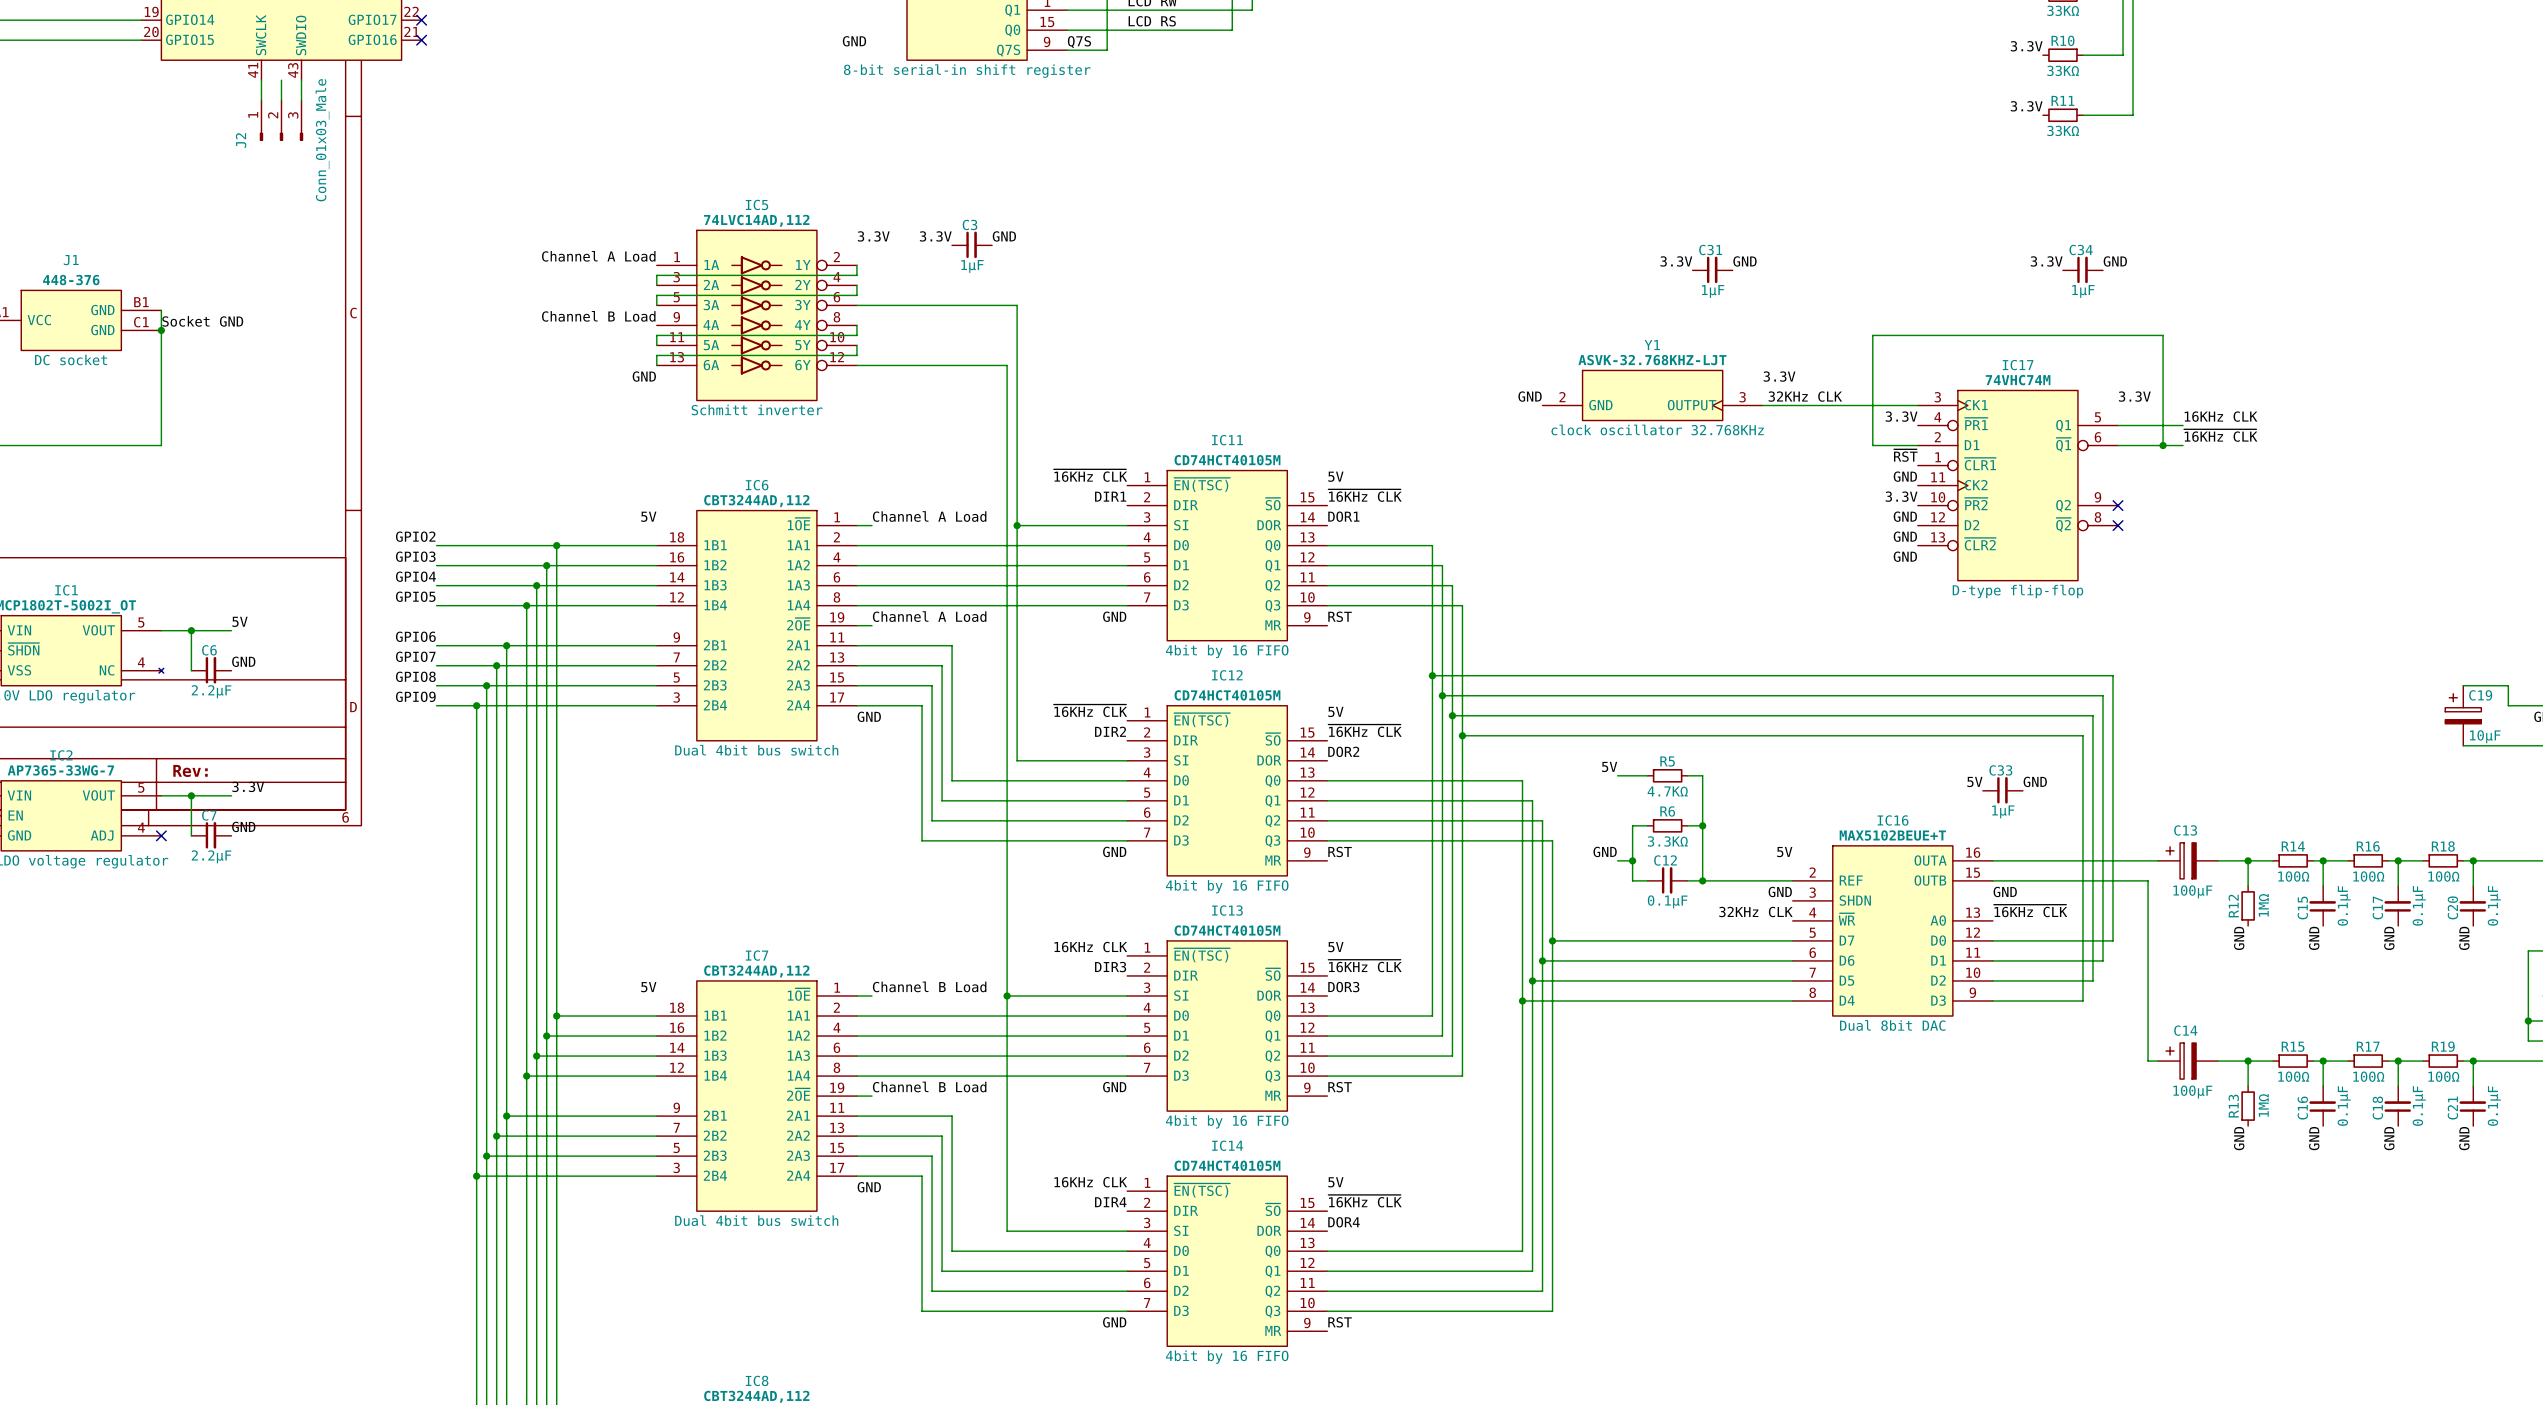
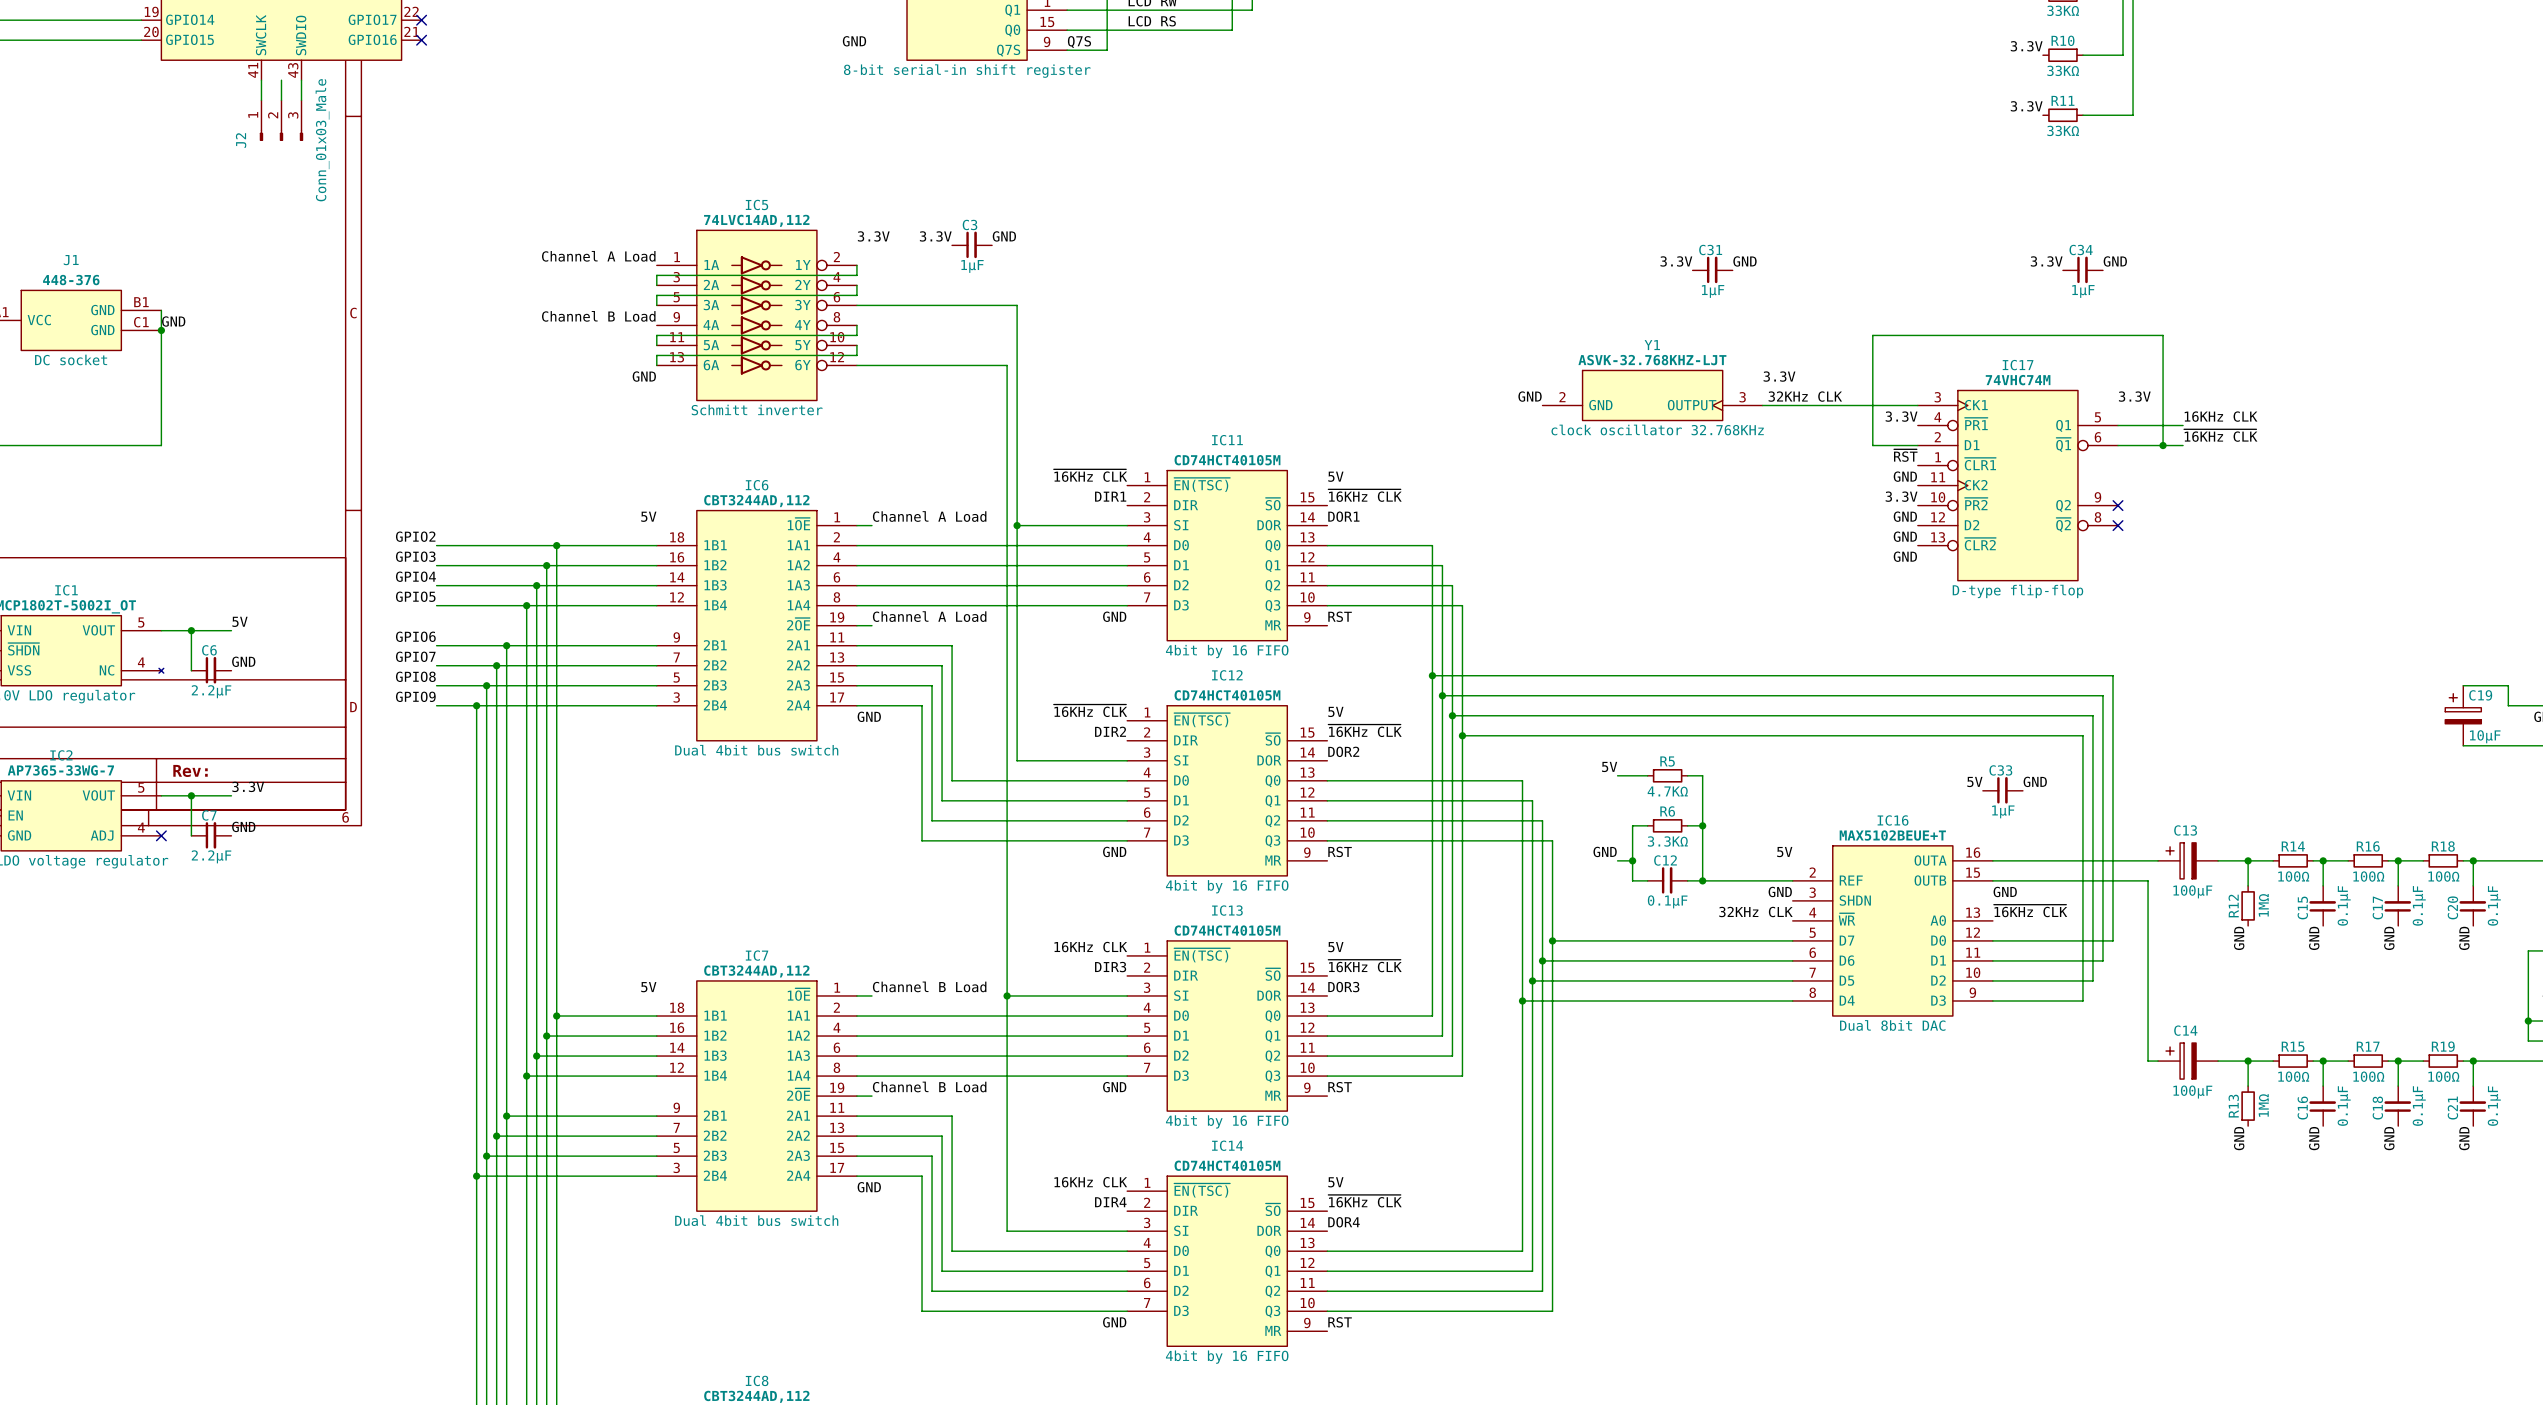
label: Socket GND (202, 321) -> GND (173, 321)

